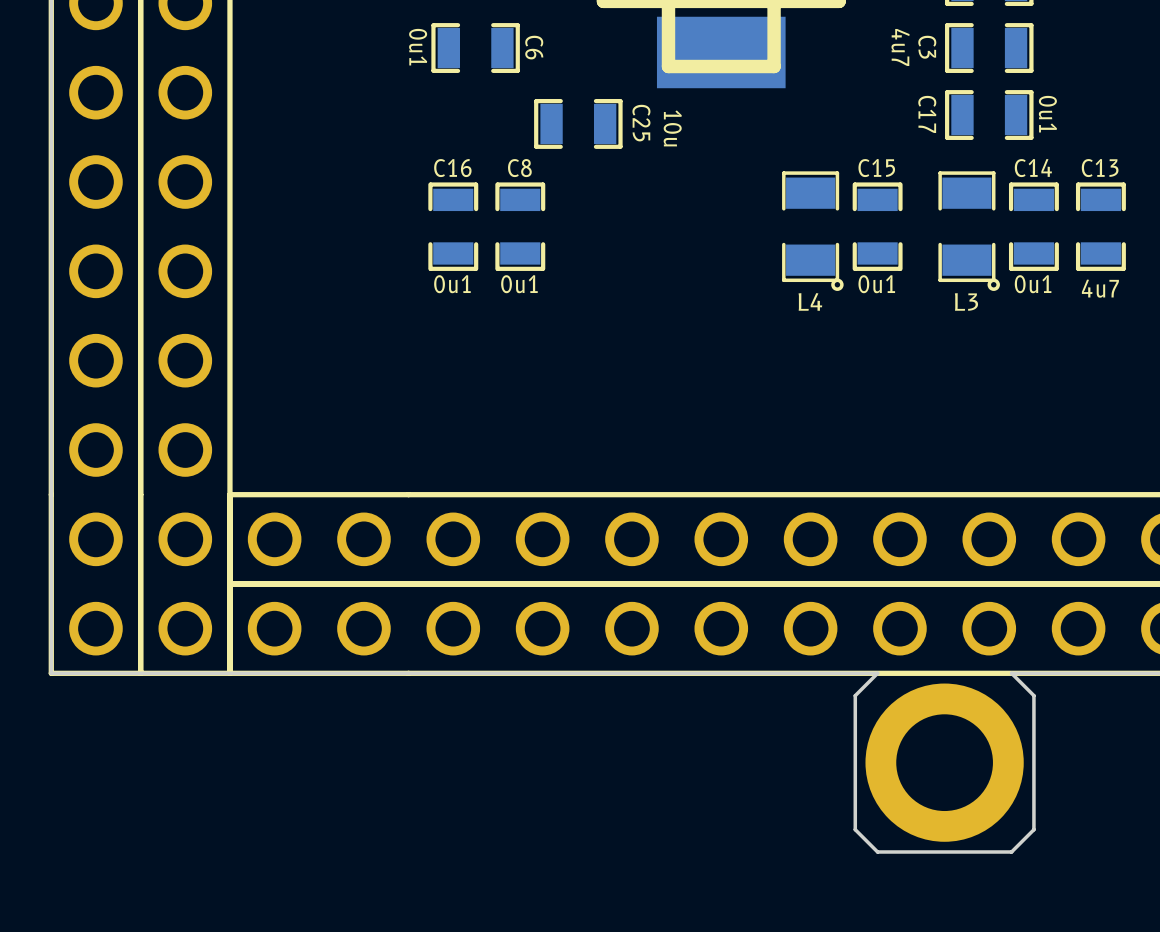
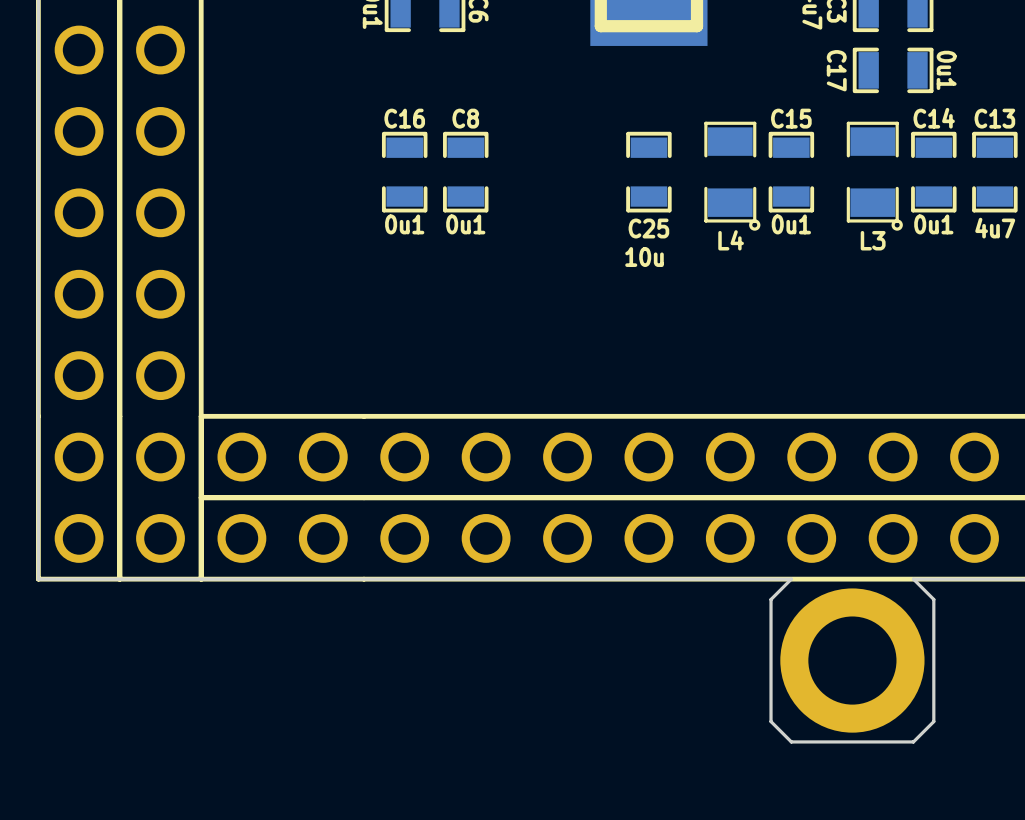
C25 rotation: 0° (578, 123) -> 90° clockwise (648, 172)
C25 position: (578, 123) -> (648, 172)

